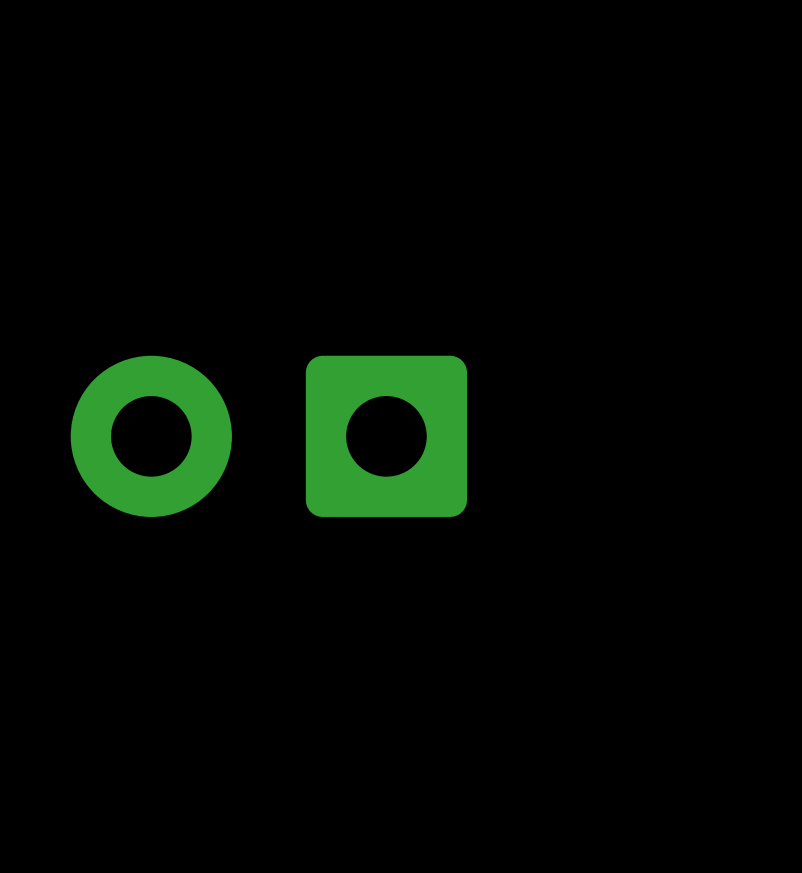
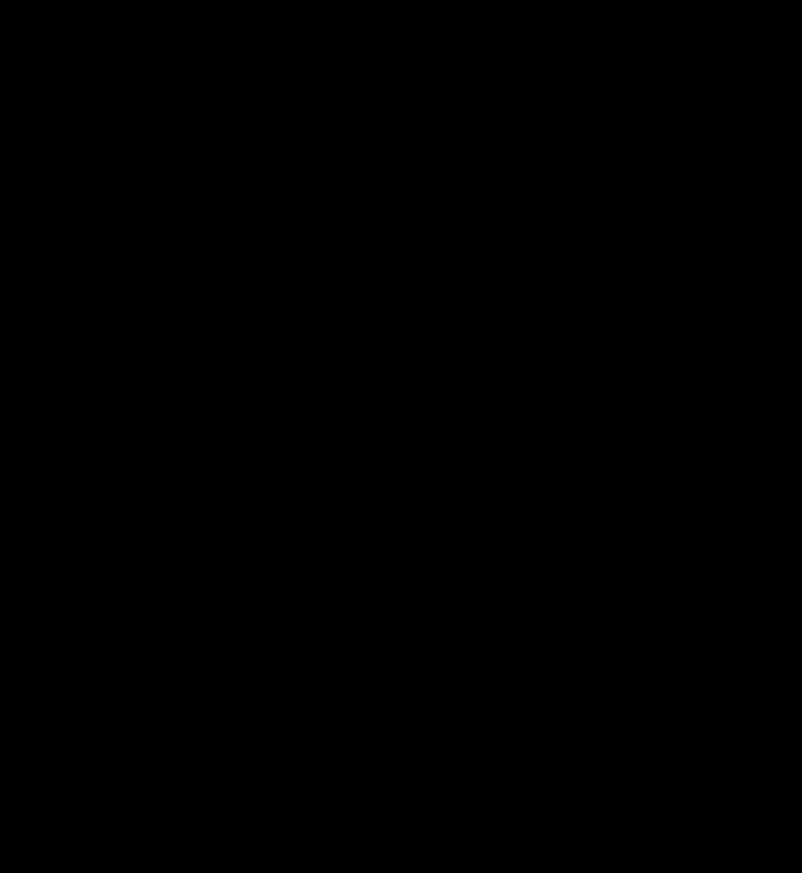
part: (268, 436) -> none

